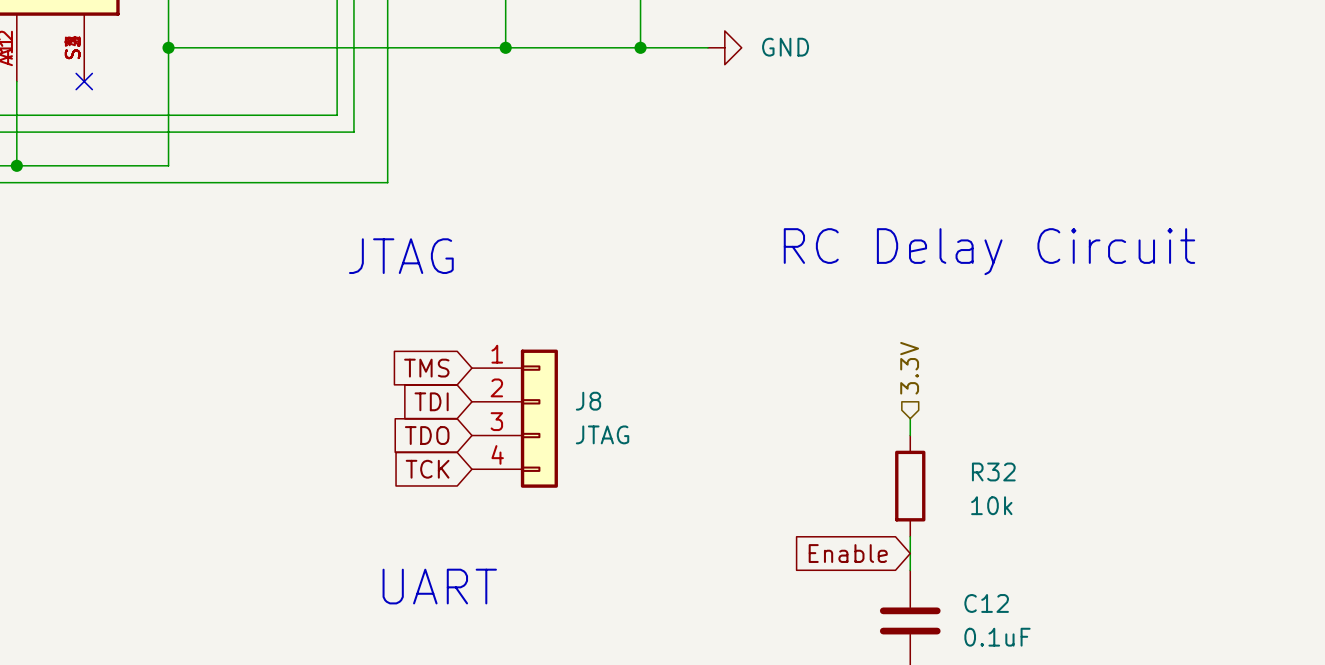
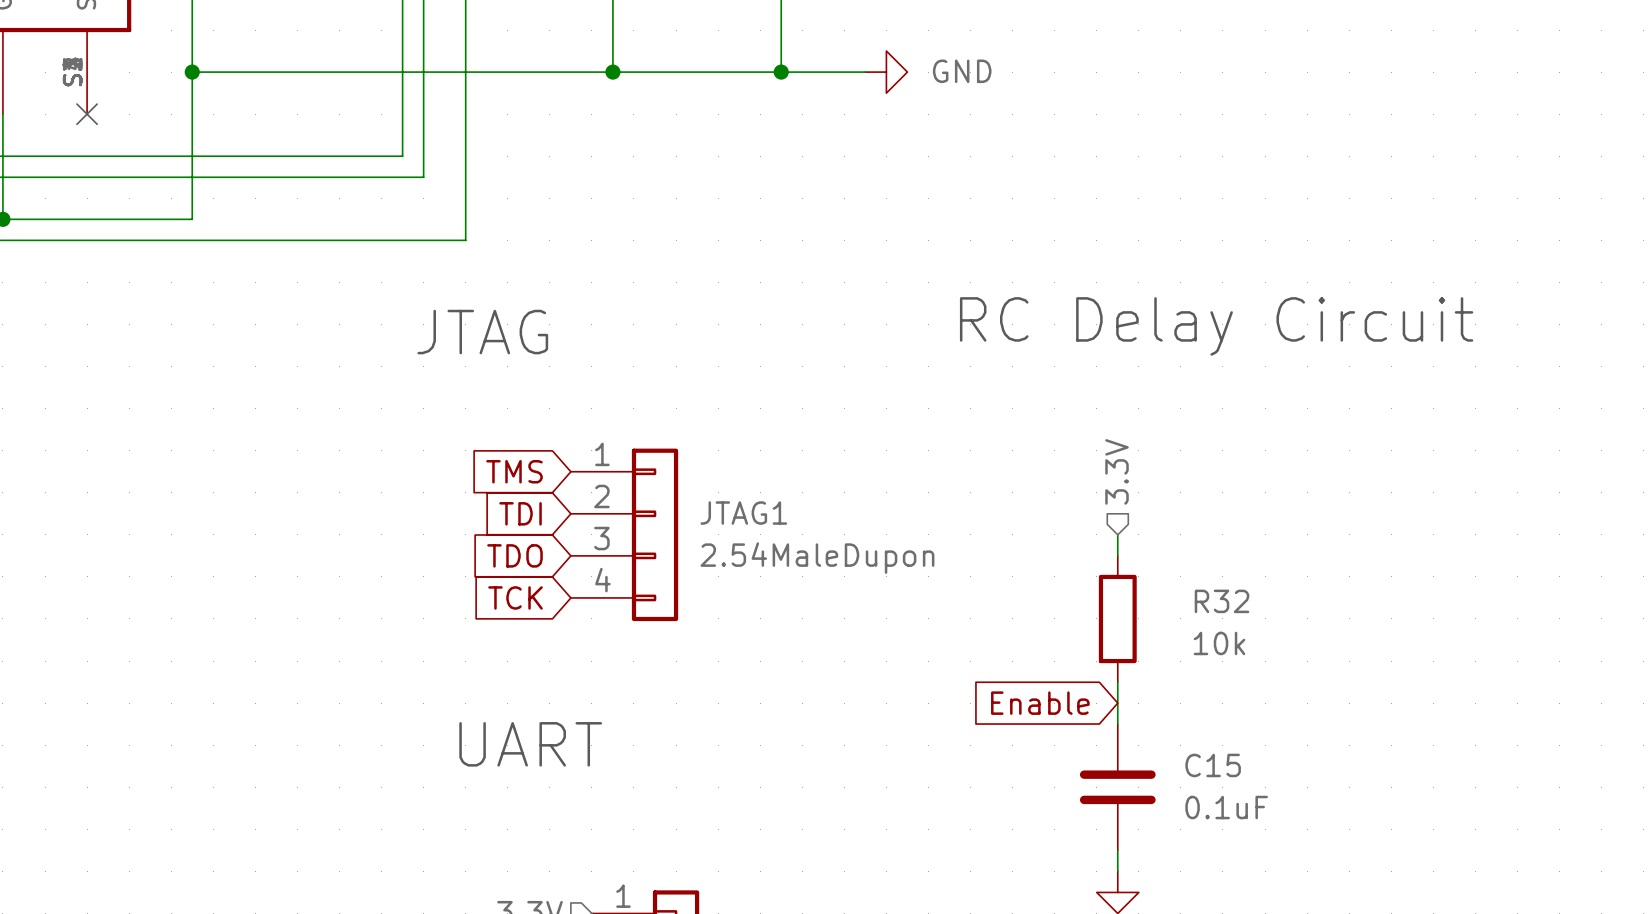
J8 name: J8 (588, 401) -> JTAG1 (743, 513)
J8 value: JTAG (602, 434) -> 2.54MaleDupon (817, 558)
C12 name: C12 (986, 603) -> C15 (1213, 765)

